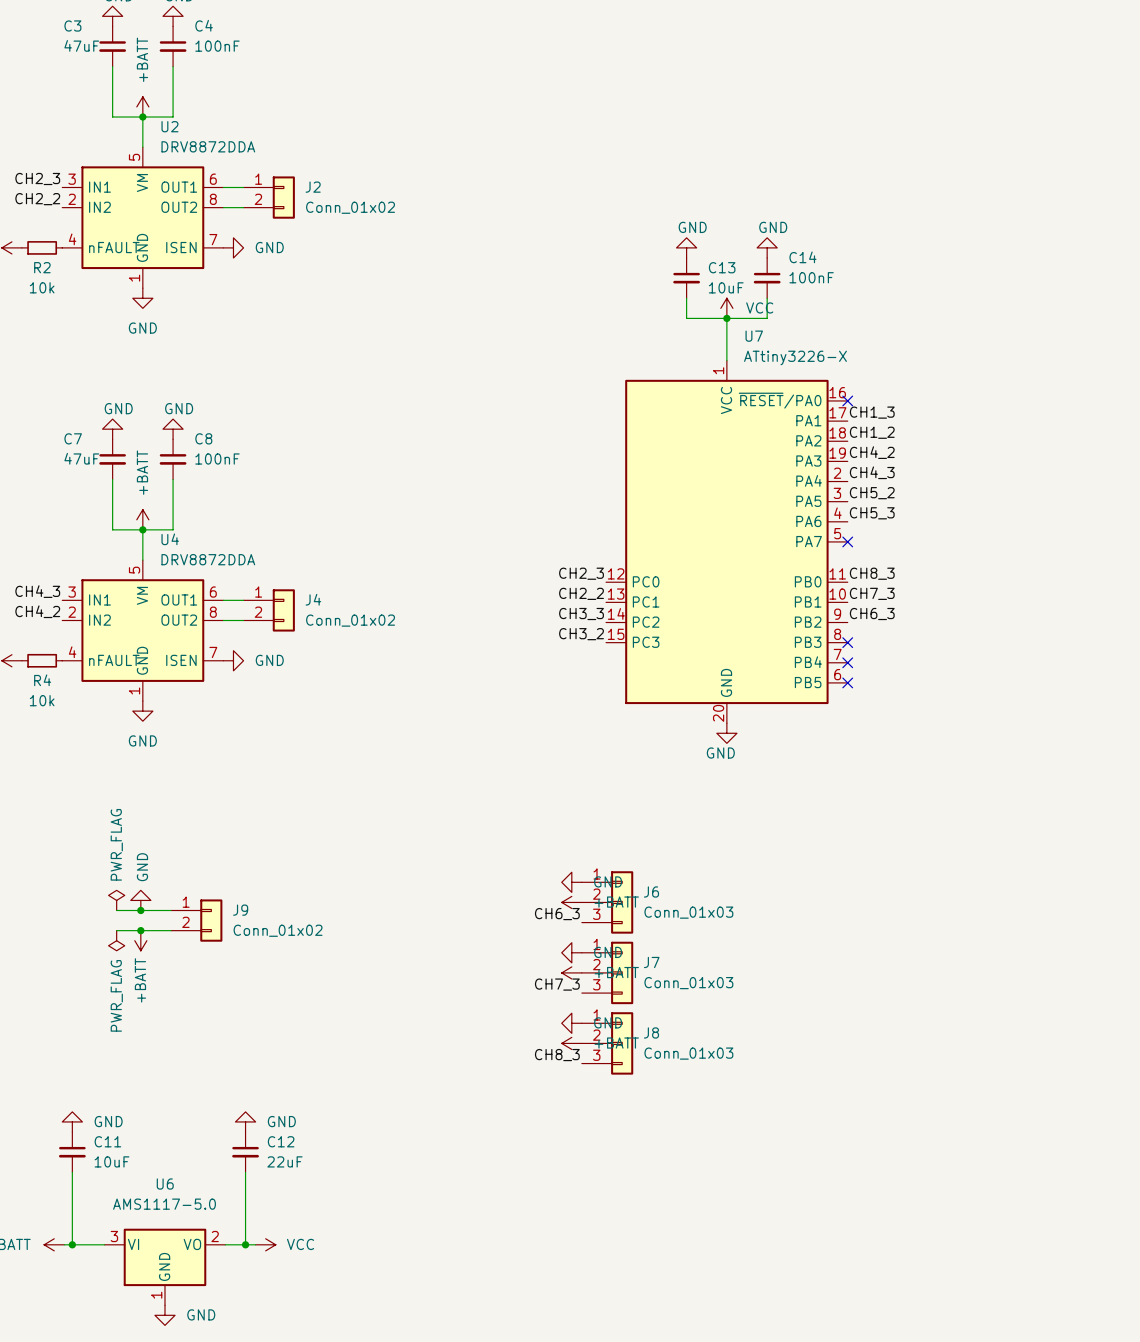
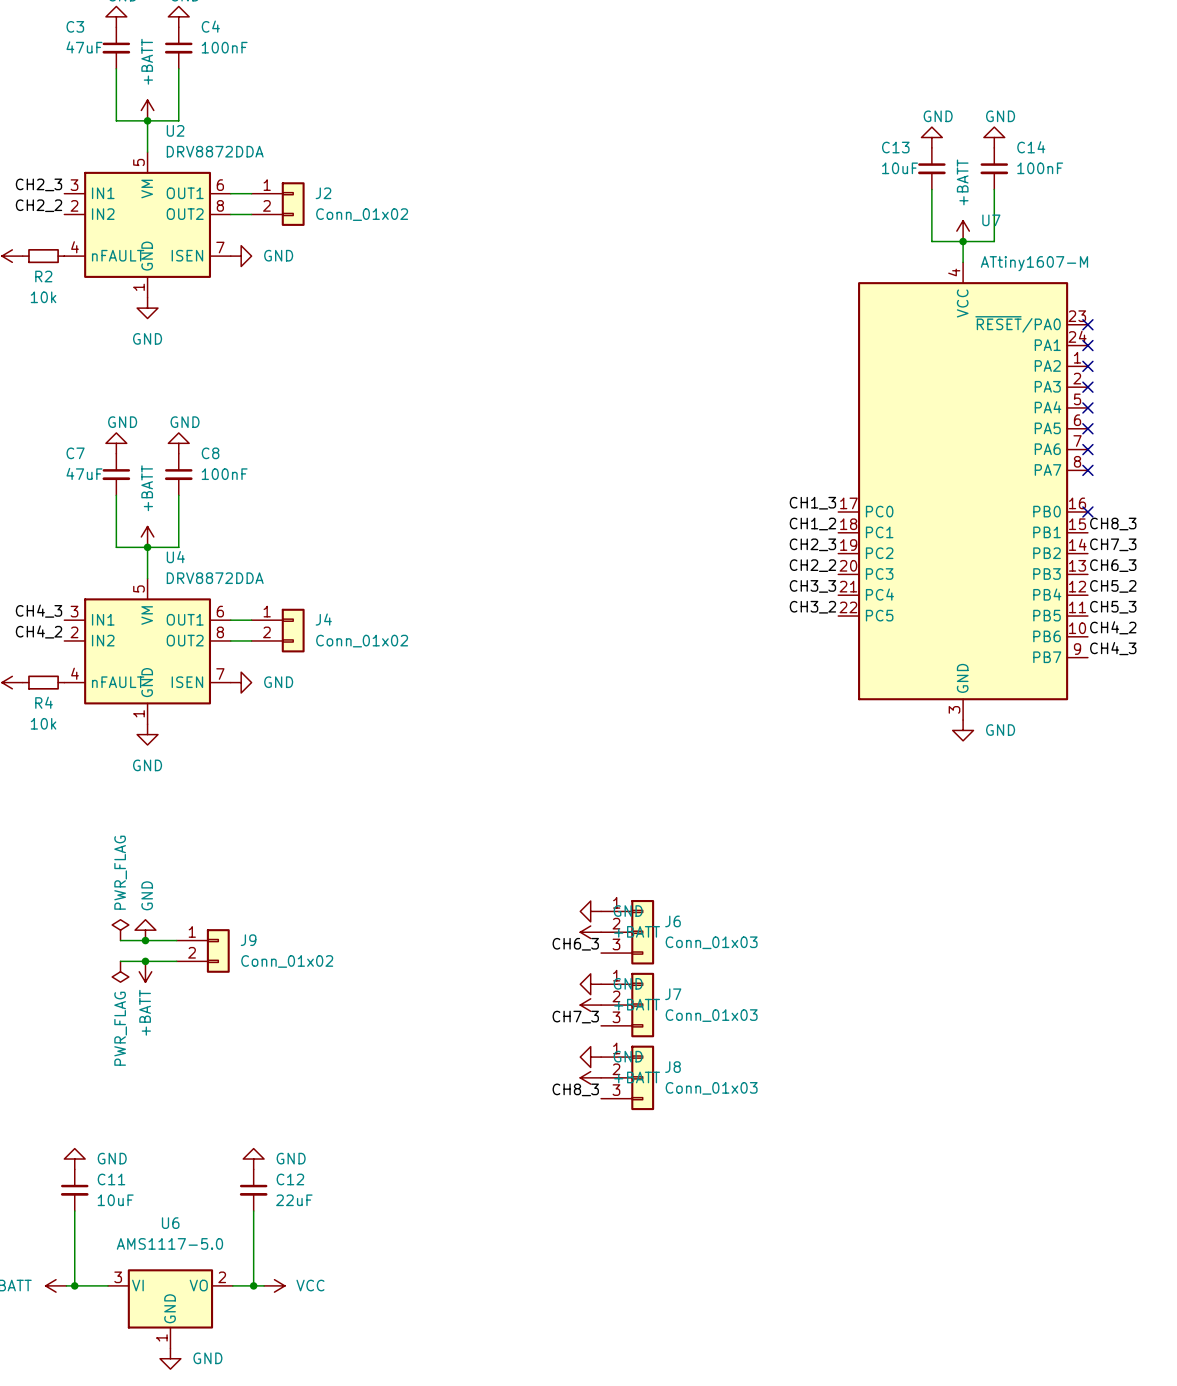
power symbol: none -> GND (931, 137)
power symbol: none -> GND (994, 137)
wire: none -> (931, 189) (931, 241) (994, 241) (994, 189)
power symbol: none -> +BATT (963, 231)
wire: none -> (963, 241) (963, 262)
junction: none -> (963, 241)
power symbol: GND (686, 247) -> none
power symbol: GND (767, 247) -> none
C13 name position: C13 (722, 267) -> C13 (895, 147)
C13 position: (686, 278) -> (931, 168)
C14 position: (767, 278) -> (994, 168)
C13 value position: 10uF (726, 287) -> 10uF (900, 168)
wire: (686, 298) (686, 318) (767, 318) (767, 298) -> none
power symbol: VCC (726, 308) -> none
no-connect mark: none -> (1087, 324)
wire: (726, 318) (726, 360) -> none
junction: (726, 318) -> none
no-connect mark: none -> (1087, 345)
U7 name position: U7 (754, 336) -> U7 (991, 220)
no-connect mark: none -> (1087, 366)
U7 value: ATtiny3226-X (795, 357) -> ATtiny1607-M (1034, 263)
U7 symbol: [606, 360, 848, 724] -> [838, 262, 1088, 721]
no-connect mark: none -> (1087, 387)
no-connect mark: none -> (1087, 407)
no-connect mark: (847, 400) -> none
label position: CH1_3 (872, 412) -> CH1_3 (812, 503)
no-connect mark: none -> (1087, 428)
label position: CH1_2 (872, 432) -> CH1_2 (812, 524)
no-connect mark: none -> (1087, 449)
label: CH4_2 (872, 452) -> none
no-connect mark: none -> (1087, 470)
label: CH4_3 (872, 472) -> none
label: CH5_2 (872, 493) -> none
no-connect mark: none -> (1087, 511)
label: none -> CH8_3 (1113, 524)
label: CH5_3 (872, 513) -> none
label: none -> CH2_3 (812, 544)
label: none -> CH7_3 (1113, 544)
no-connect mark: (847, 541) -> none
label: none -> CH2_2 (812, 565)
label: none -> CH6_3 (1113, 565)
label: none -> CH3_3 (812, 586)
label: none -> CH5_2 (1113, 586)
label: CH2_3 (581, 573) -> none
label: CH8_3 (872, 573) -> none
label: none -> CH3_2 (812, 607)
label: none -> CH5_3 (1113, 607)
label: CH2_2 (581, 593) -> none
label: CH7_3 (872, 593) -> none
label: none -> CH4_2 (1113, 627)
label: CH3_3 (581, 614) -> none
label: CH6_3 (872, 614) -> none
label: none -> CH4_3 (1113, 648)
label: CH3_2 (581, 634) -> none
no-connect mark: (847, 642) -> none
no-connect mark: (847, 662) -> none
no-connect mark: (847, 682) -> none
power symbol: none -> GND (963, 730)
power symbol: GND (726, 733) -> none

